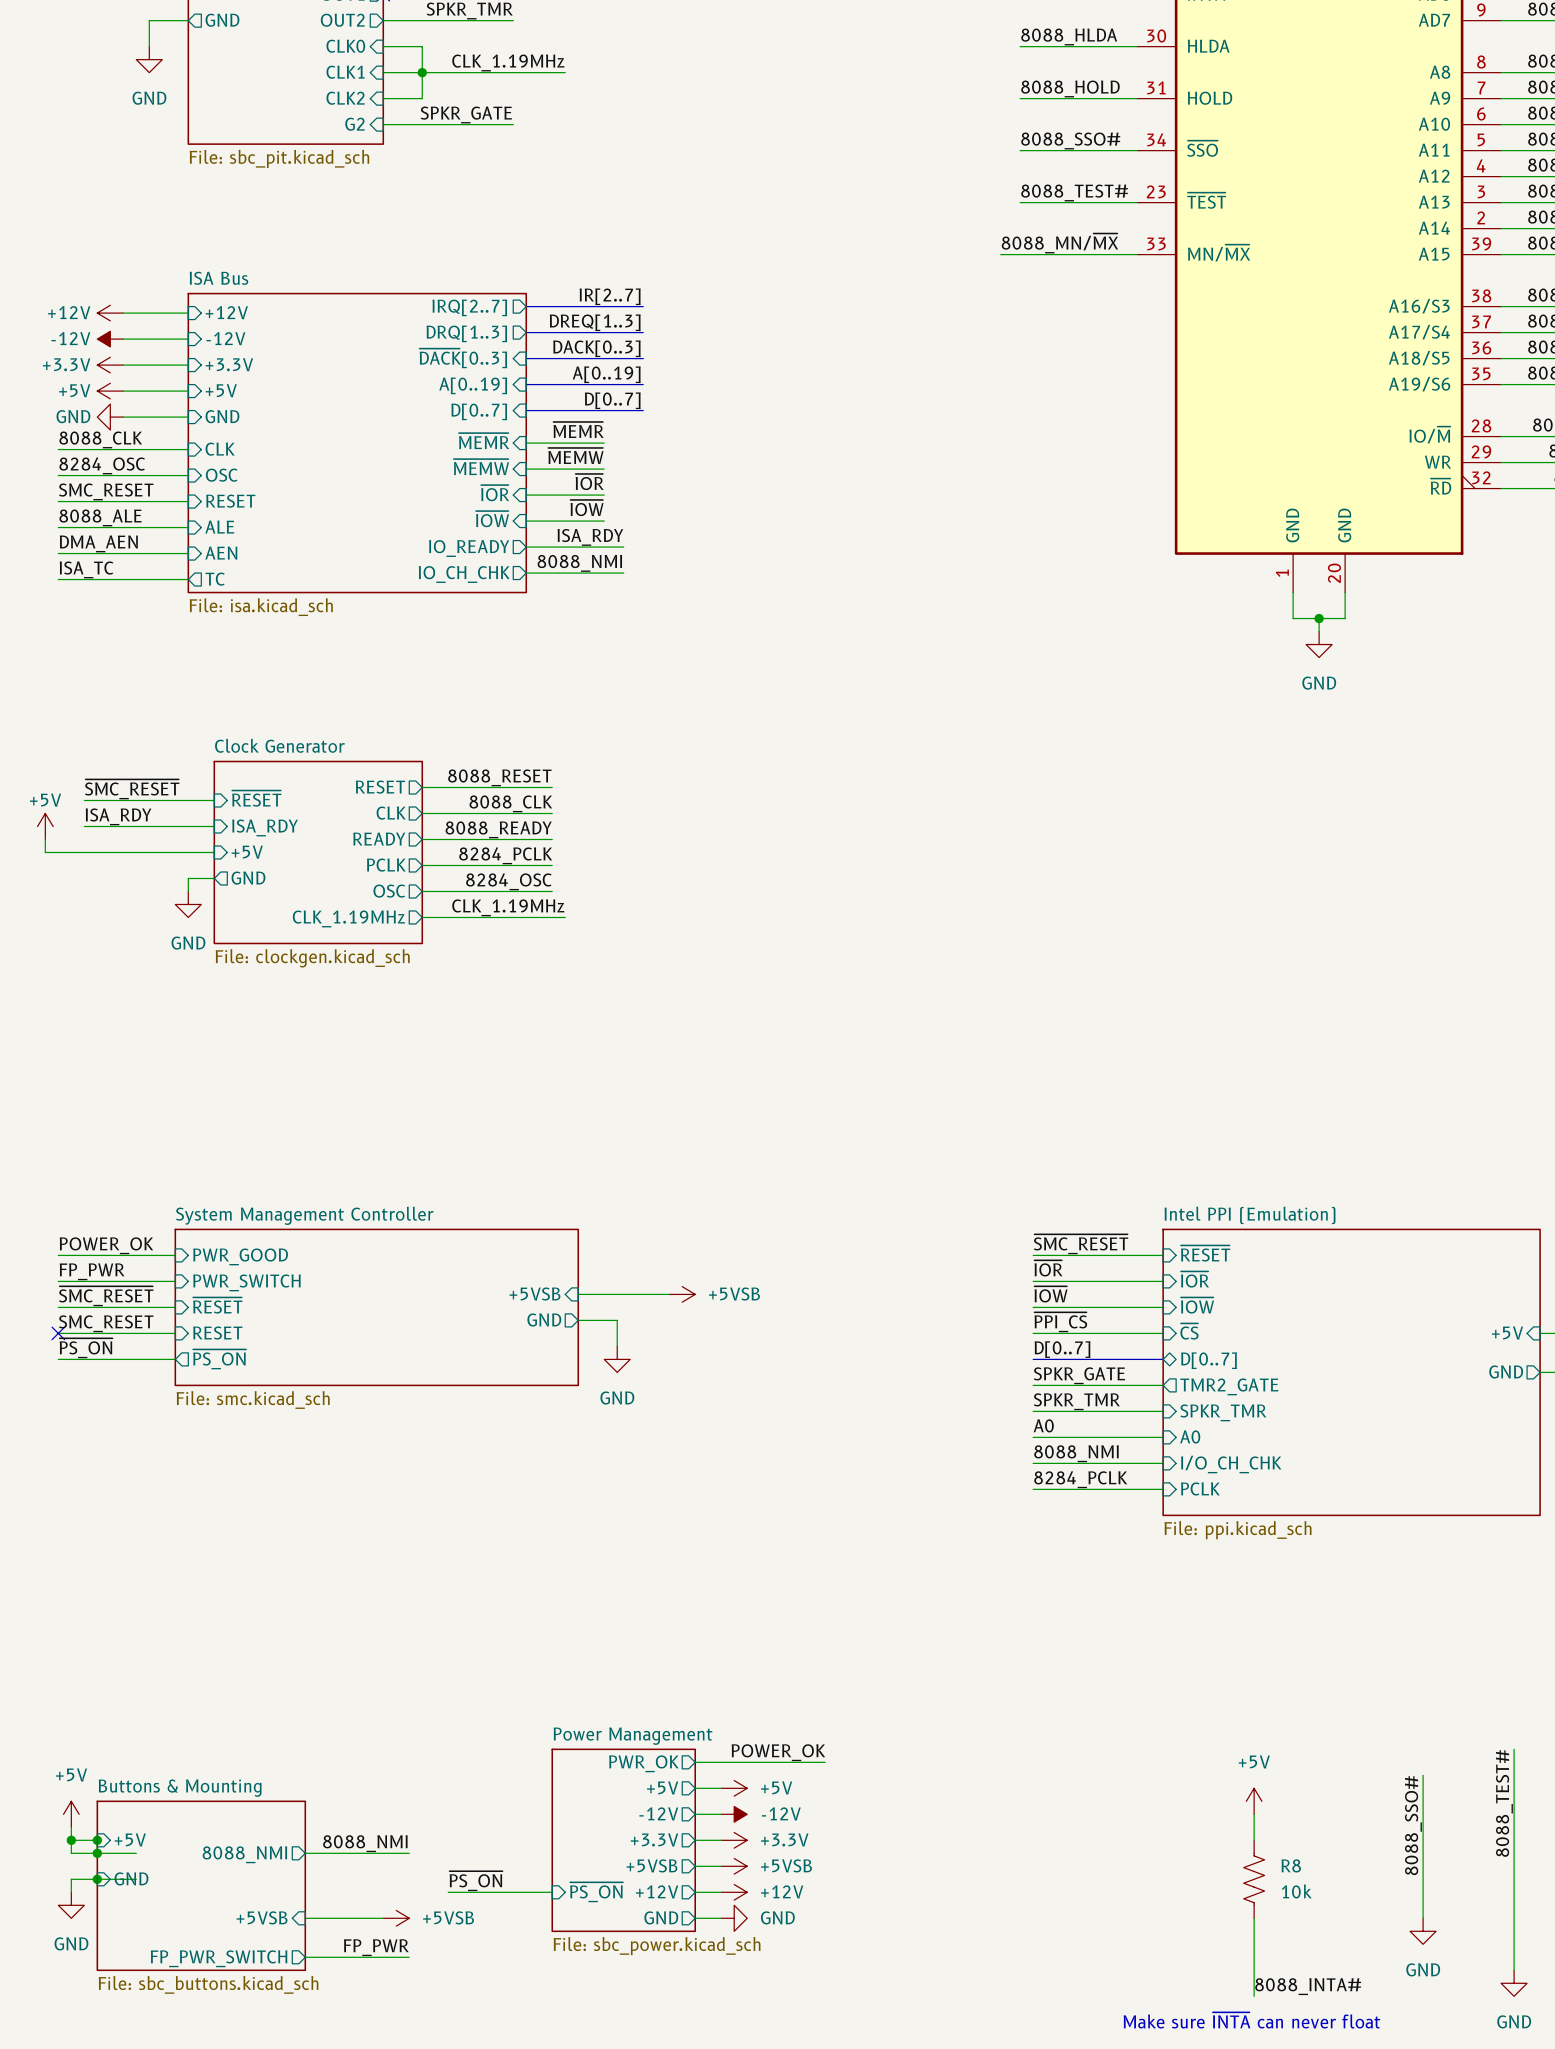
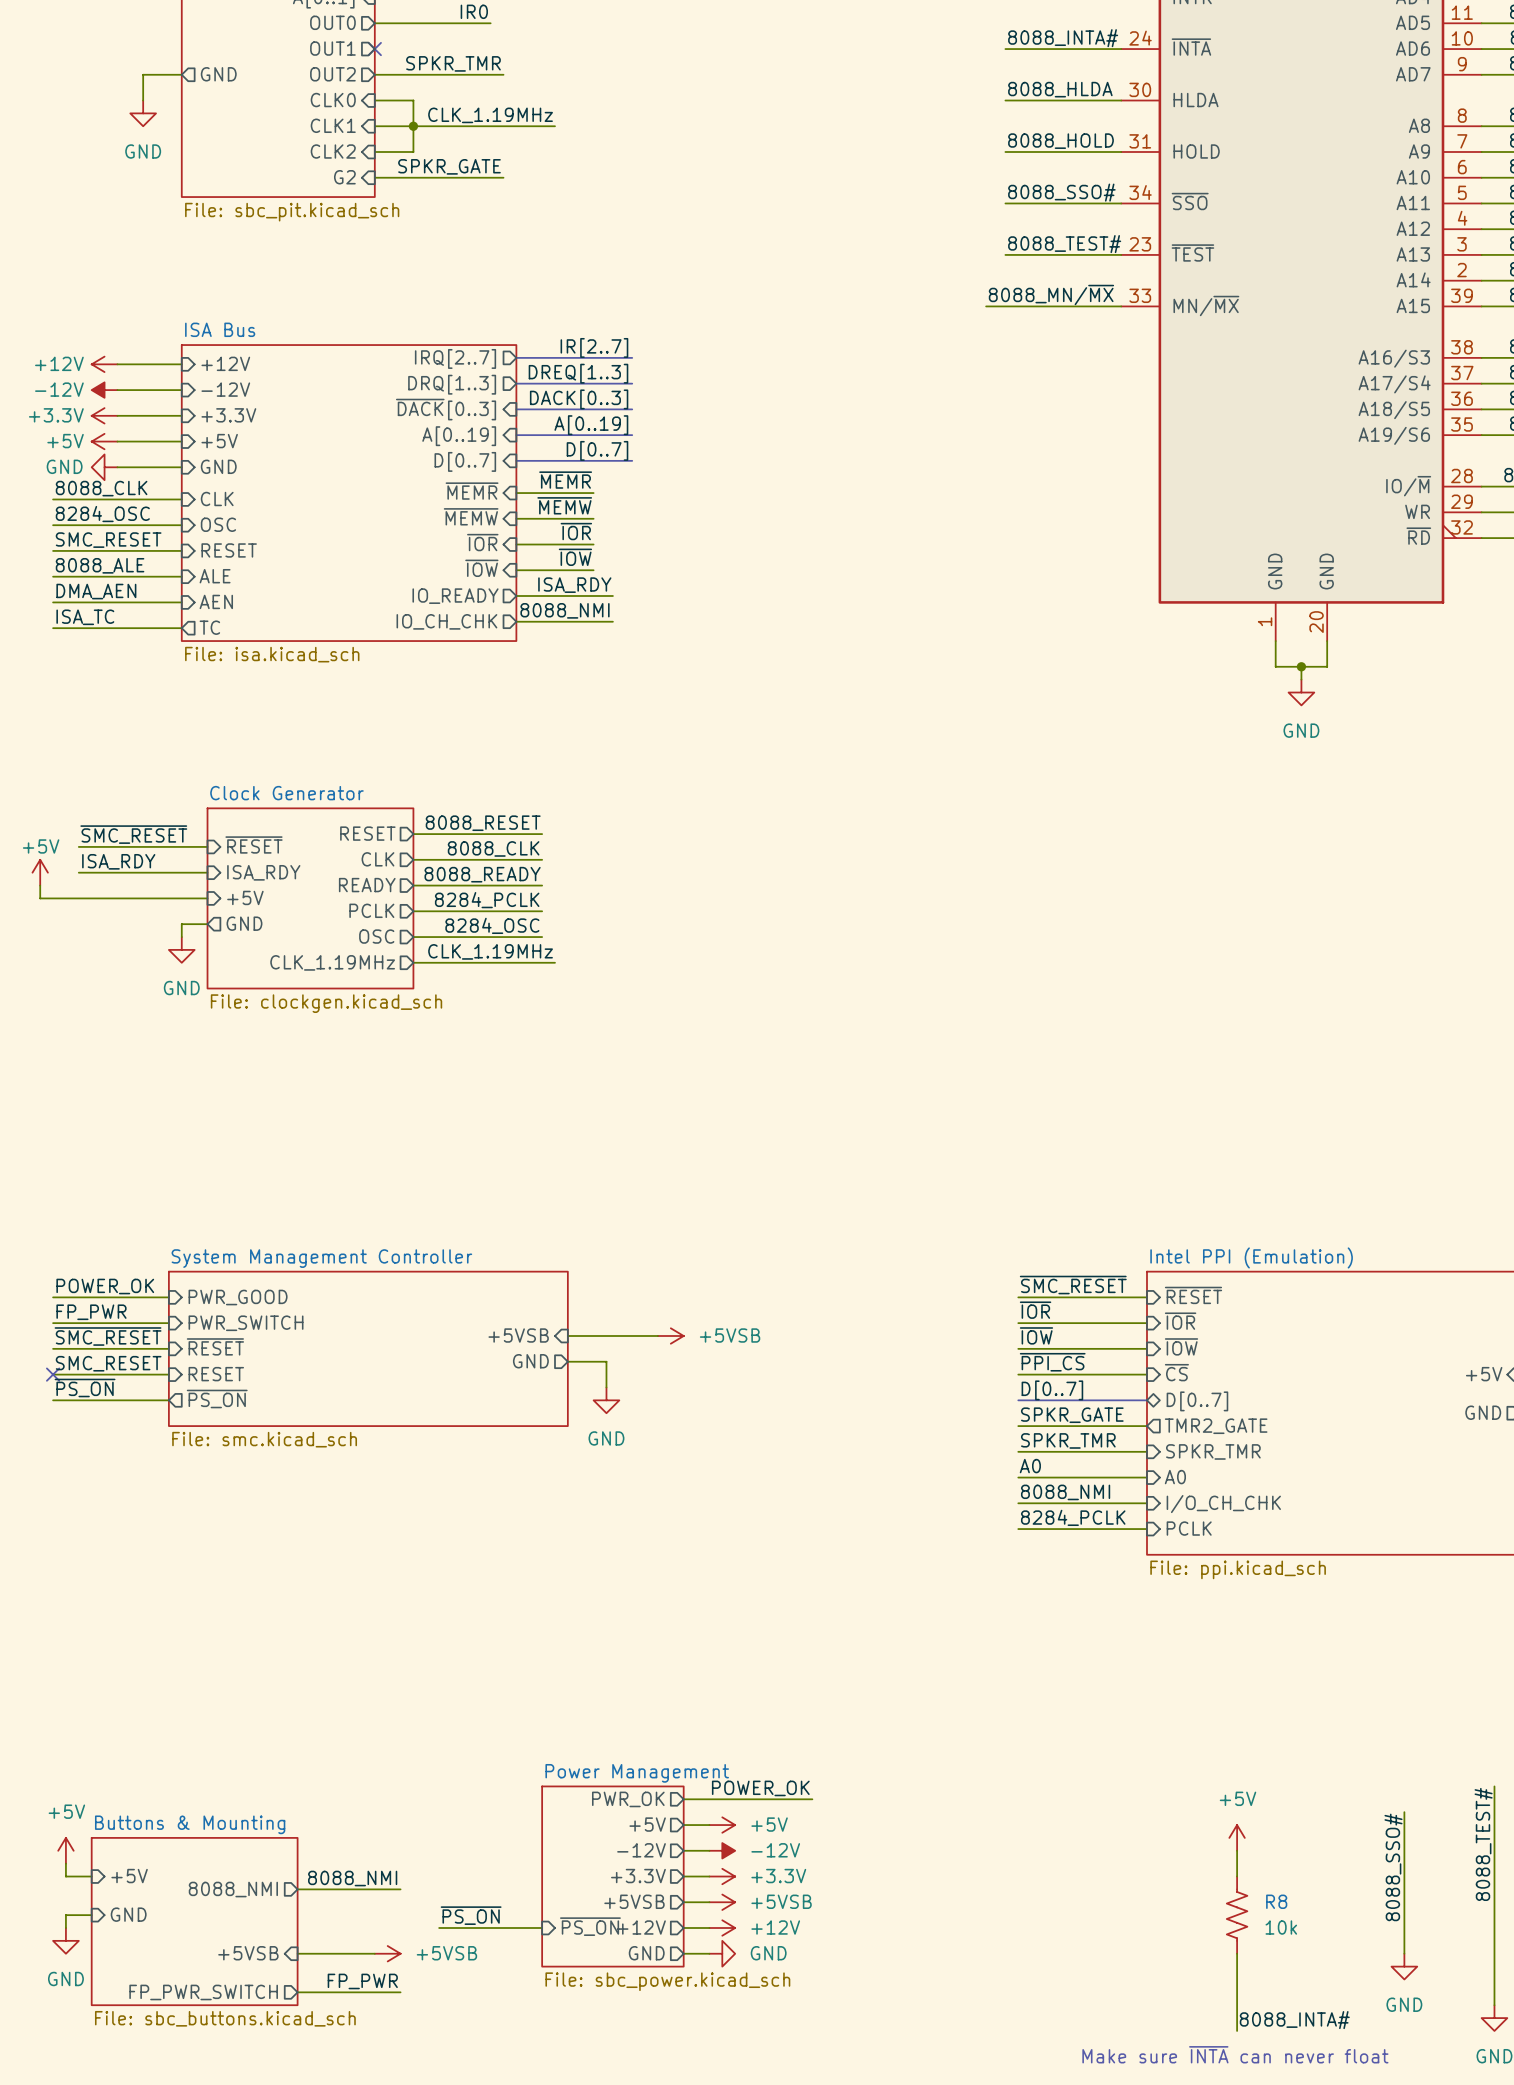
wire: (71, 1840) (71, 1853) (136, 1853) -> none
junction: (71, 1840) -> none
junction: (97, 1840) -> none
junction: (97, 1853) -> none
wire: (97, 1879) (136, 1879) -> none
junction: (97, 1879) -> none

